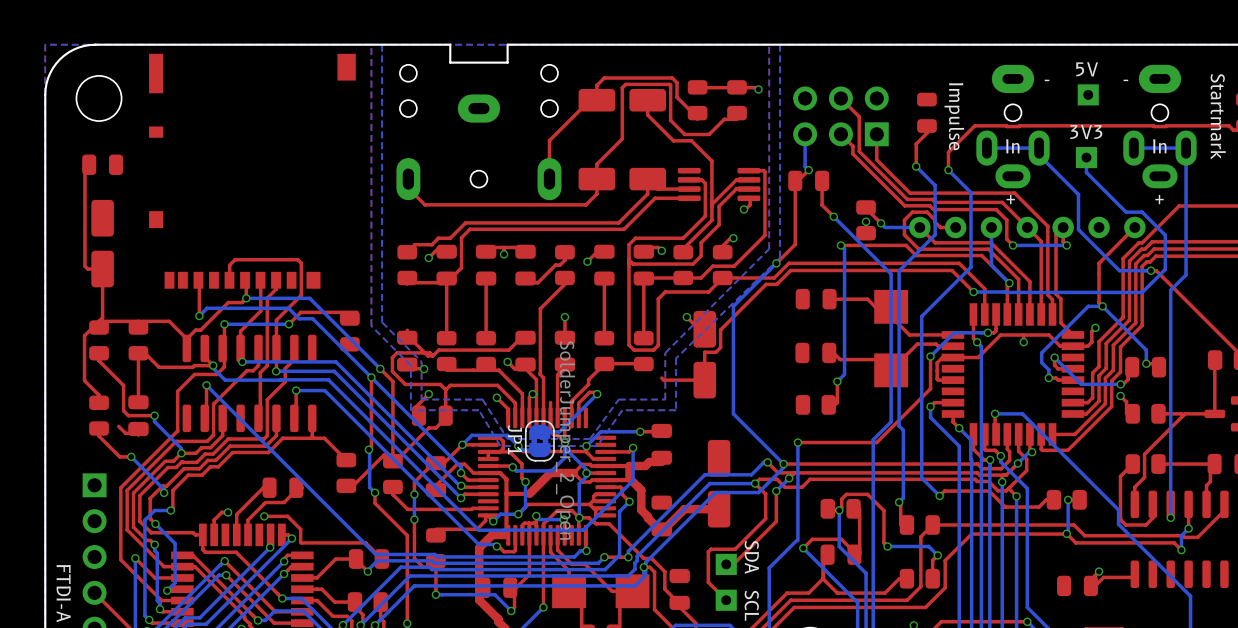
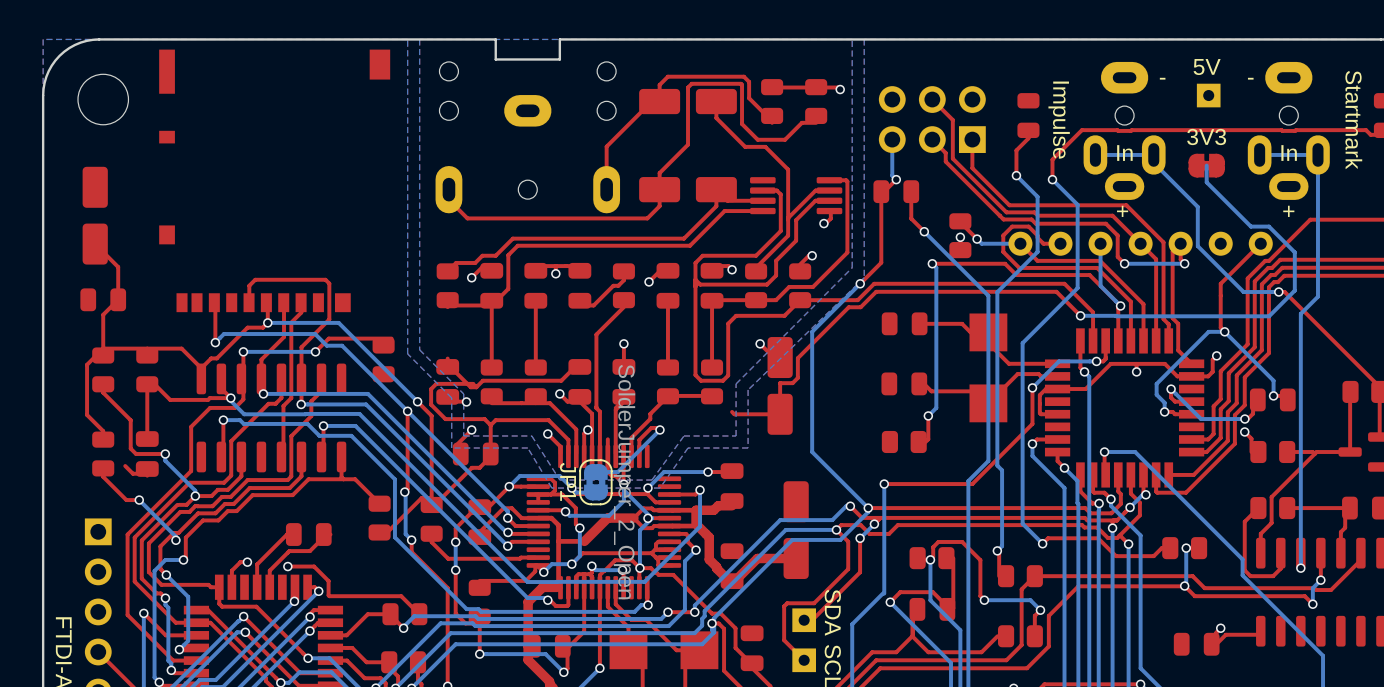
part footprint: [1075, 147, 1098, 169] -> [1188, 153, 1225, 178]
top track: (84, 164) (84, 266) (87, 269) (102, 269) -> none
part position: (102, 164) -> (103, 299)
top track: none -> (95, 244) (118, 267) (118, 299) (103, 314) (103, 355)
part position: (102, 243) -> (95, 215)
top track: (102, 261) (102, 317) (99, 321) -> none
bottom track: (206, 385) (375, 554) (424, 554) -> (223, 420) (239, 420) (243, 423) (307, 423) (319, 435) (351, 435) (394, 479) (394, 537) (466, 609)

